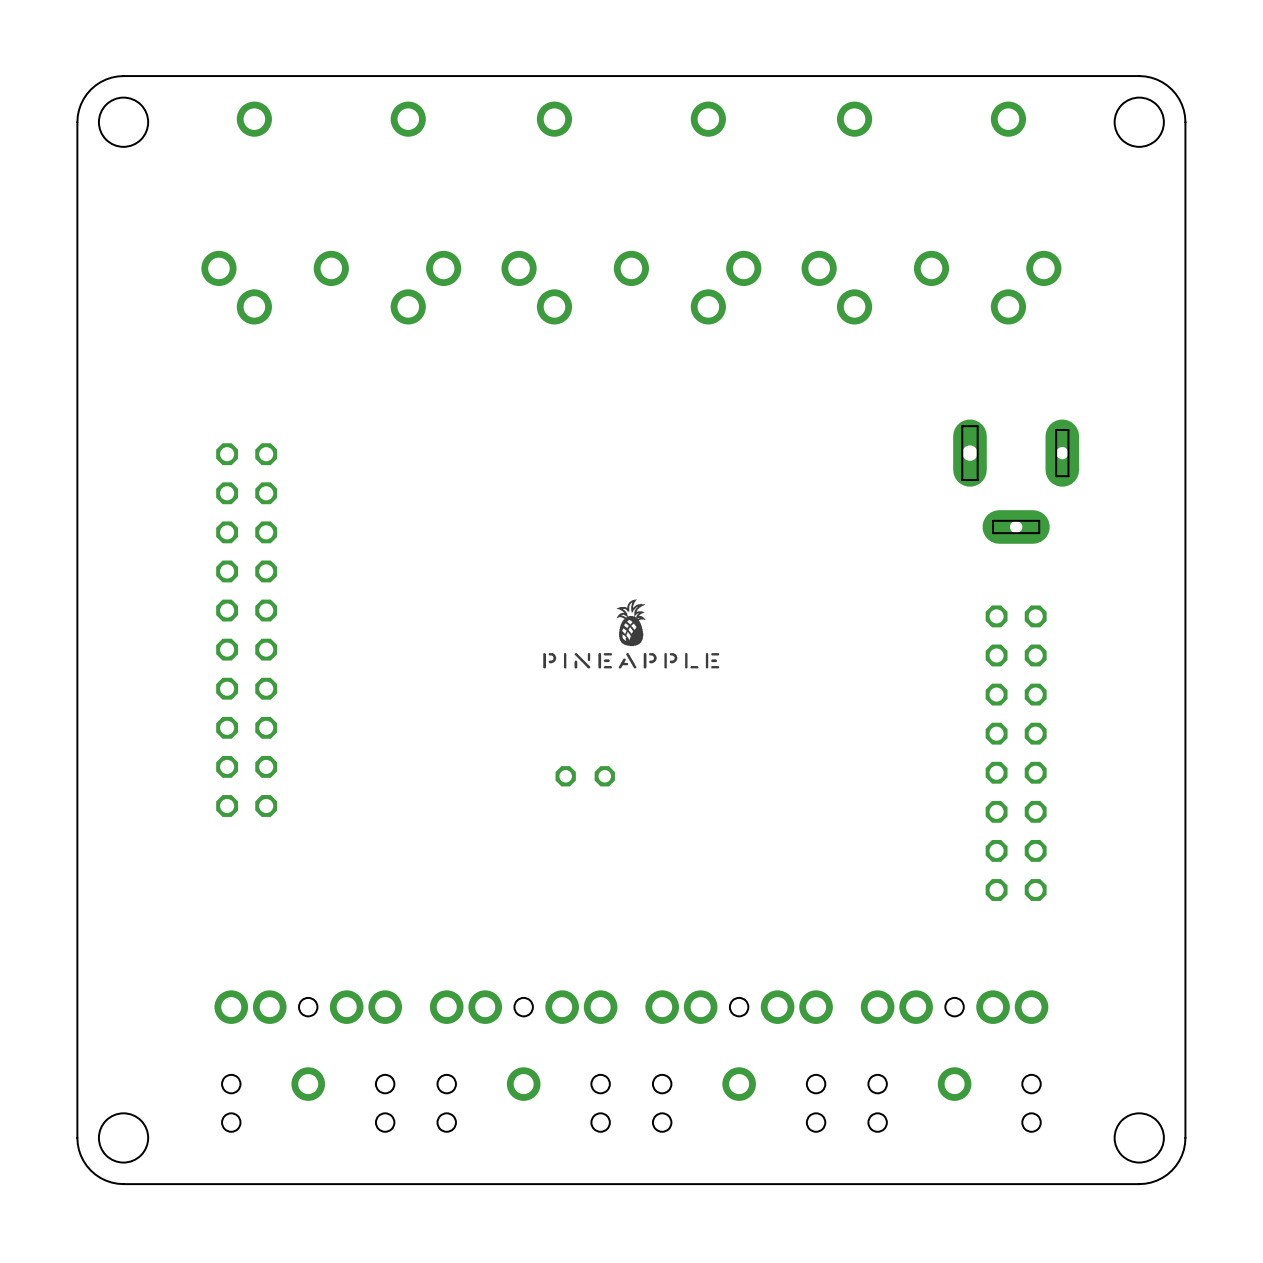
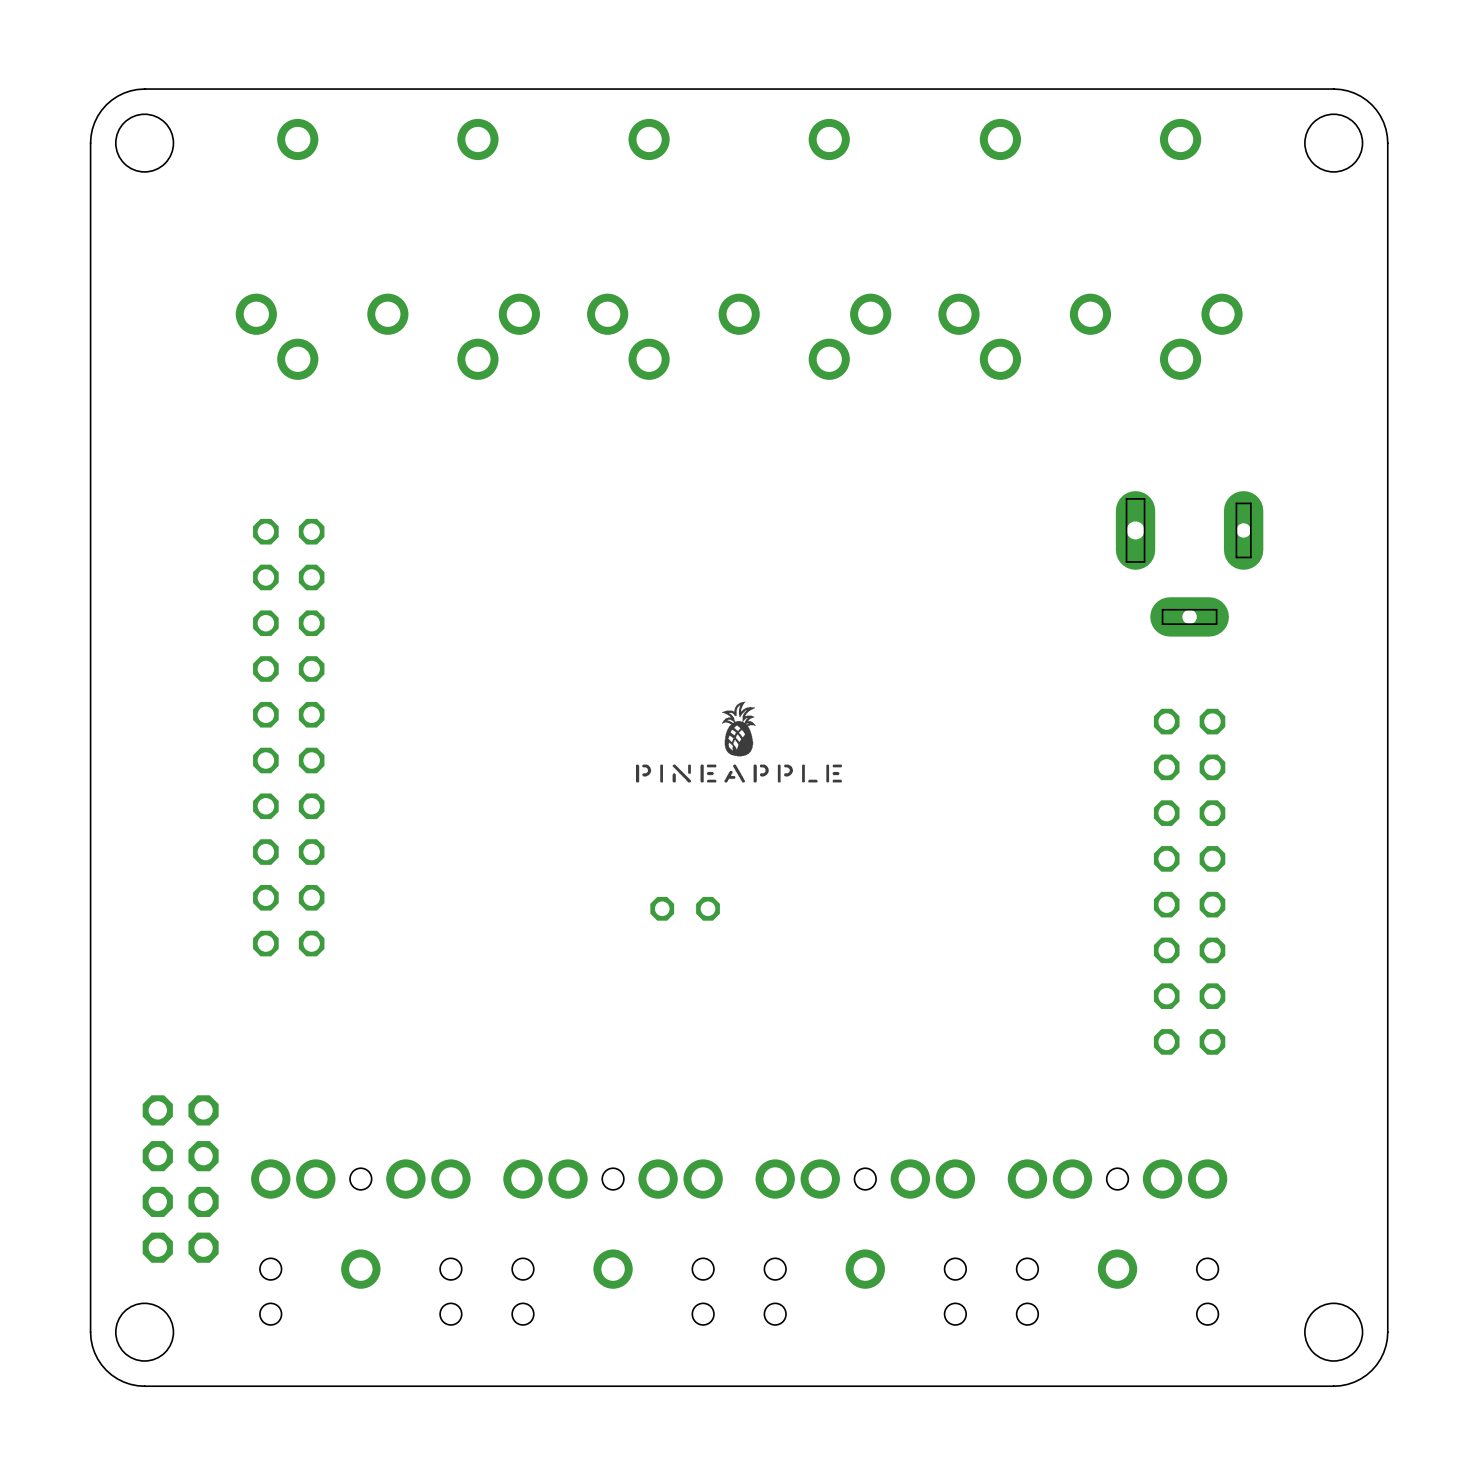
part: none -> (180, 1179)

